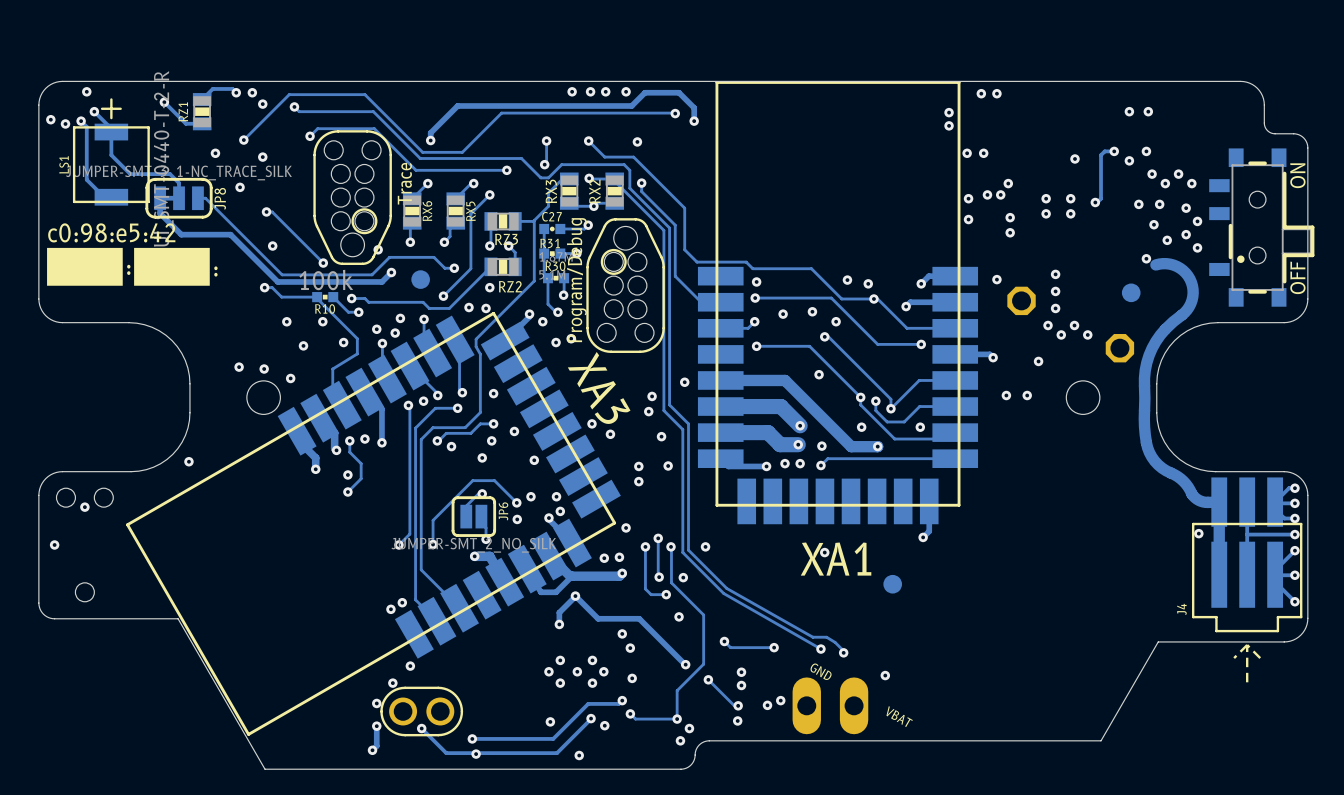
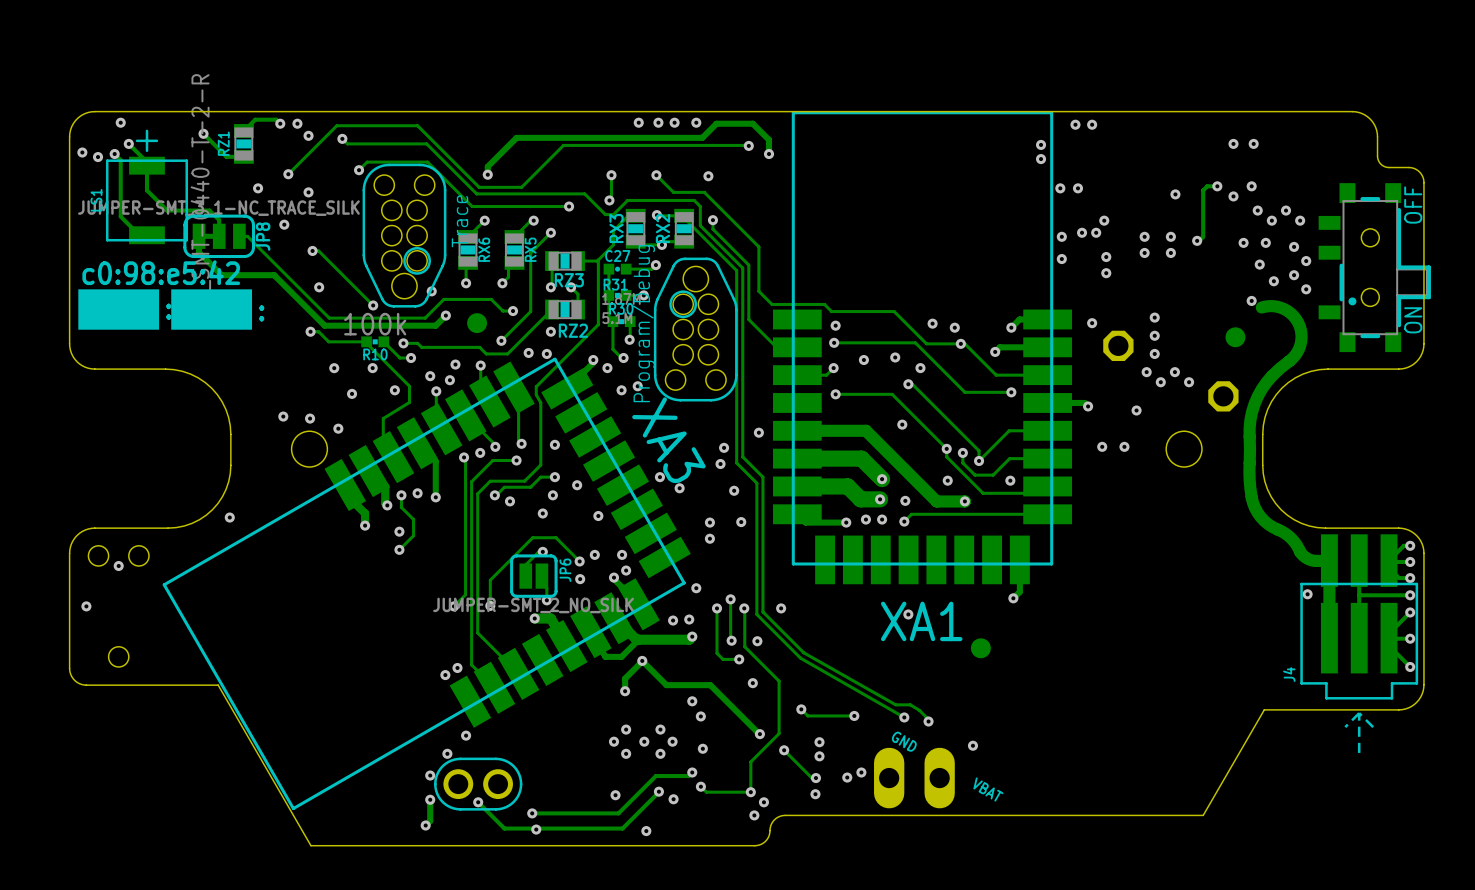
text: ON (1297, 175) -> OFF (1413, 205)
text: OFF (1297, 277) -> ON (1413, 320)

